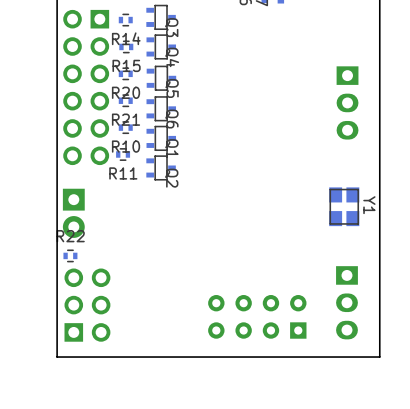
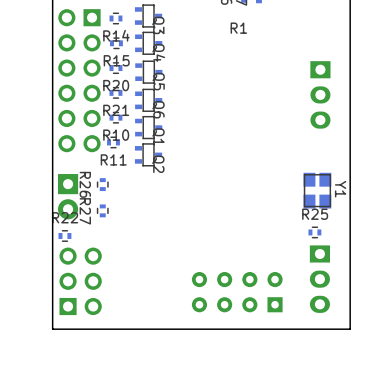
R1: none -> (238, 28)
R26: none -> (102, 184)
R27: none -> (102, 210)
R25: none -> (314, 232)

